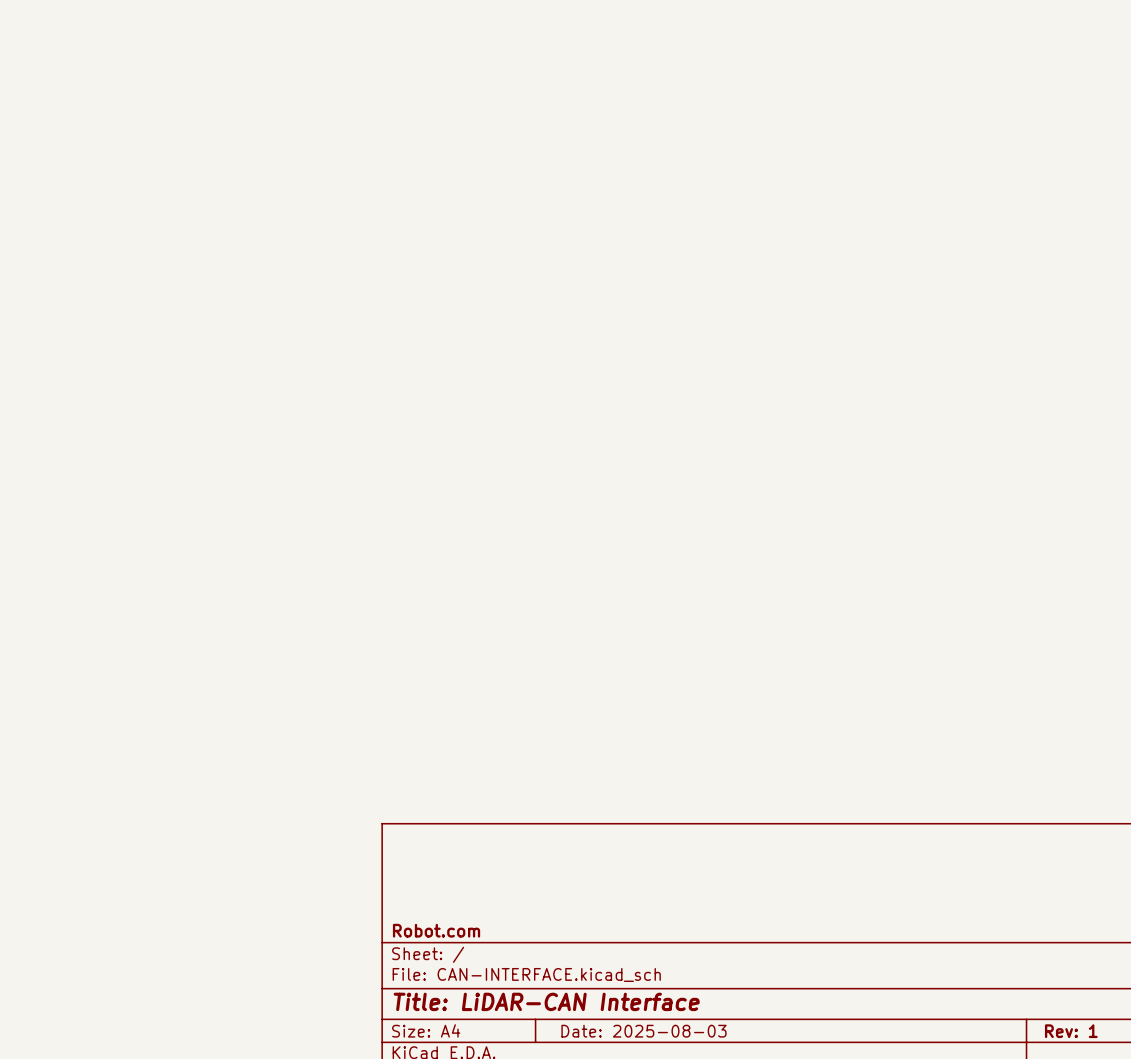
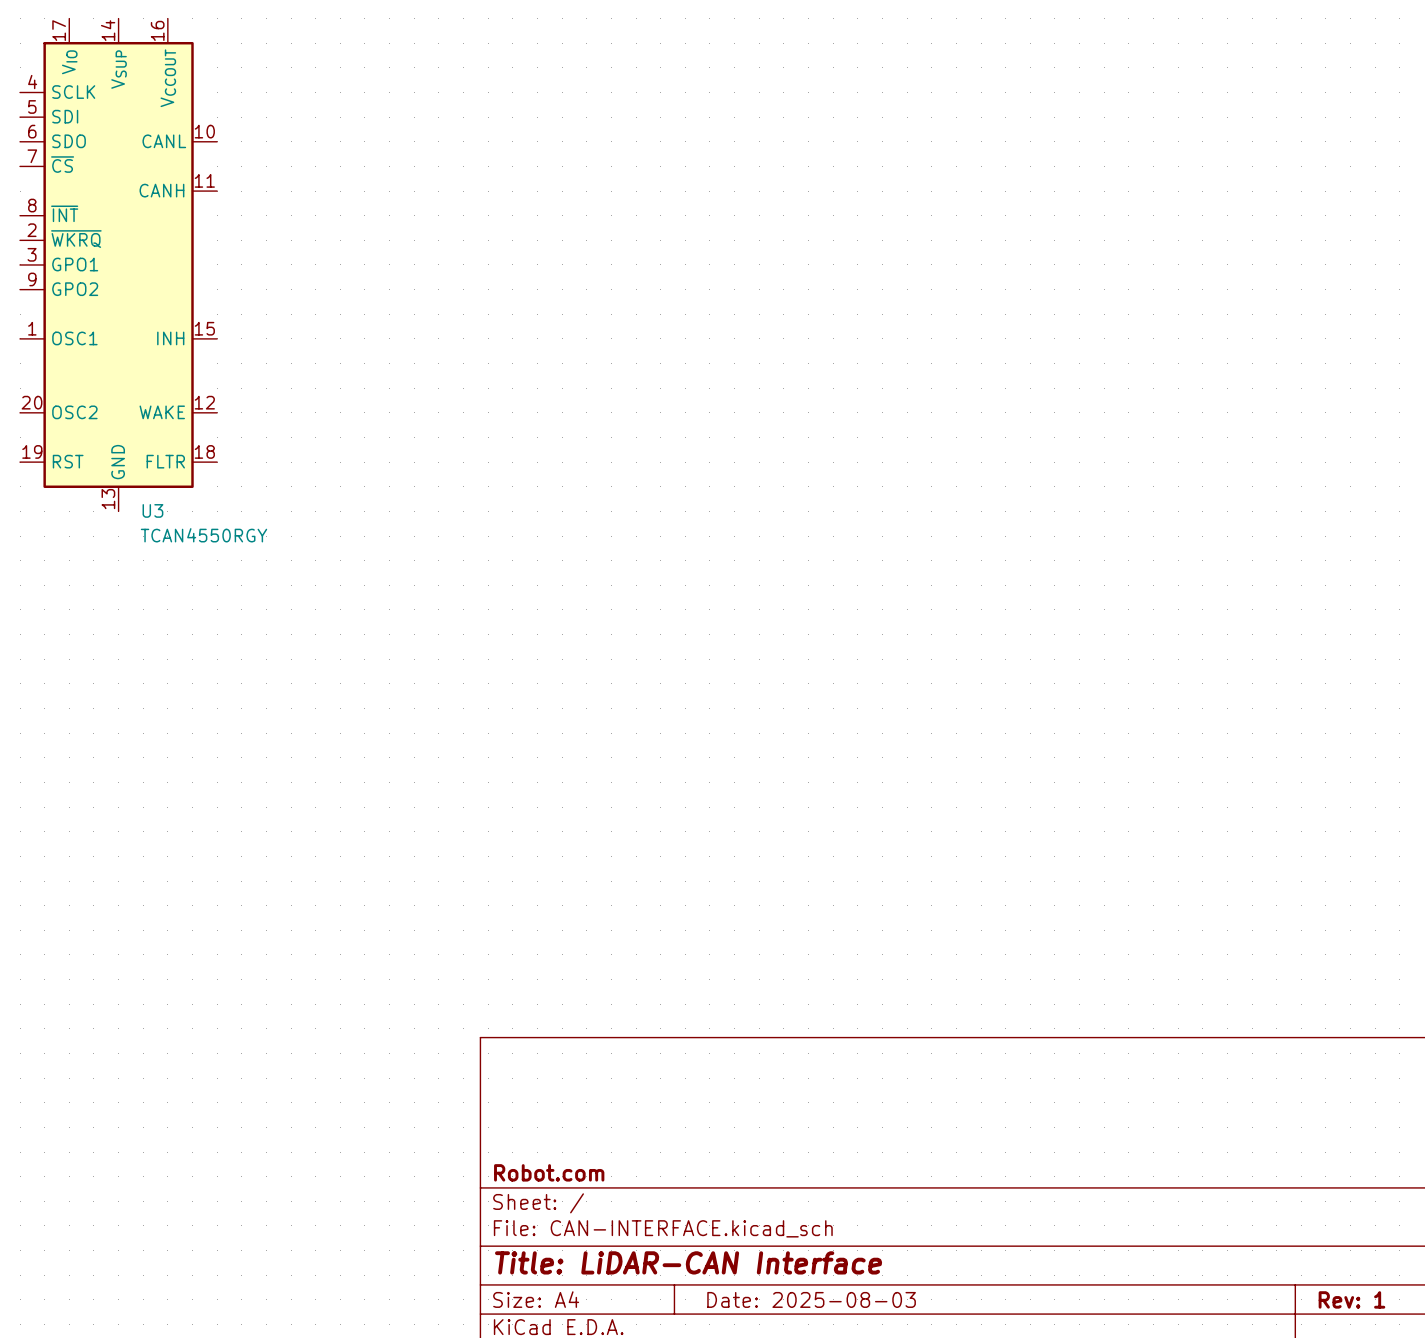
U3: none -> TCAN4550RGY (118, 264)

